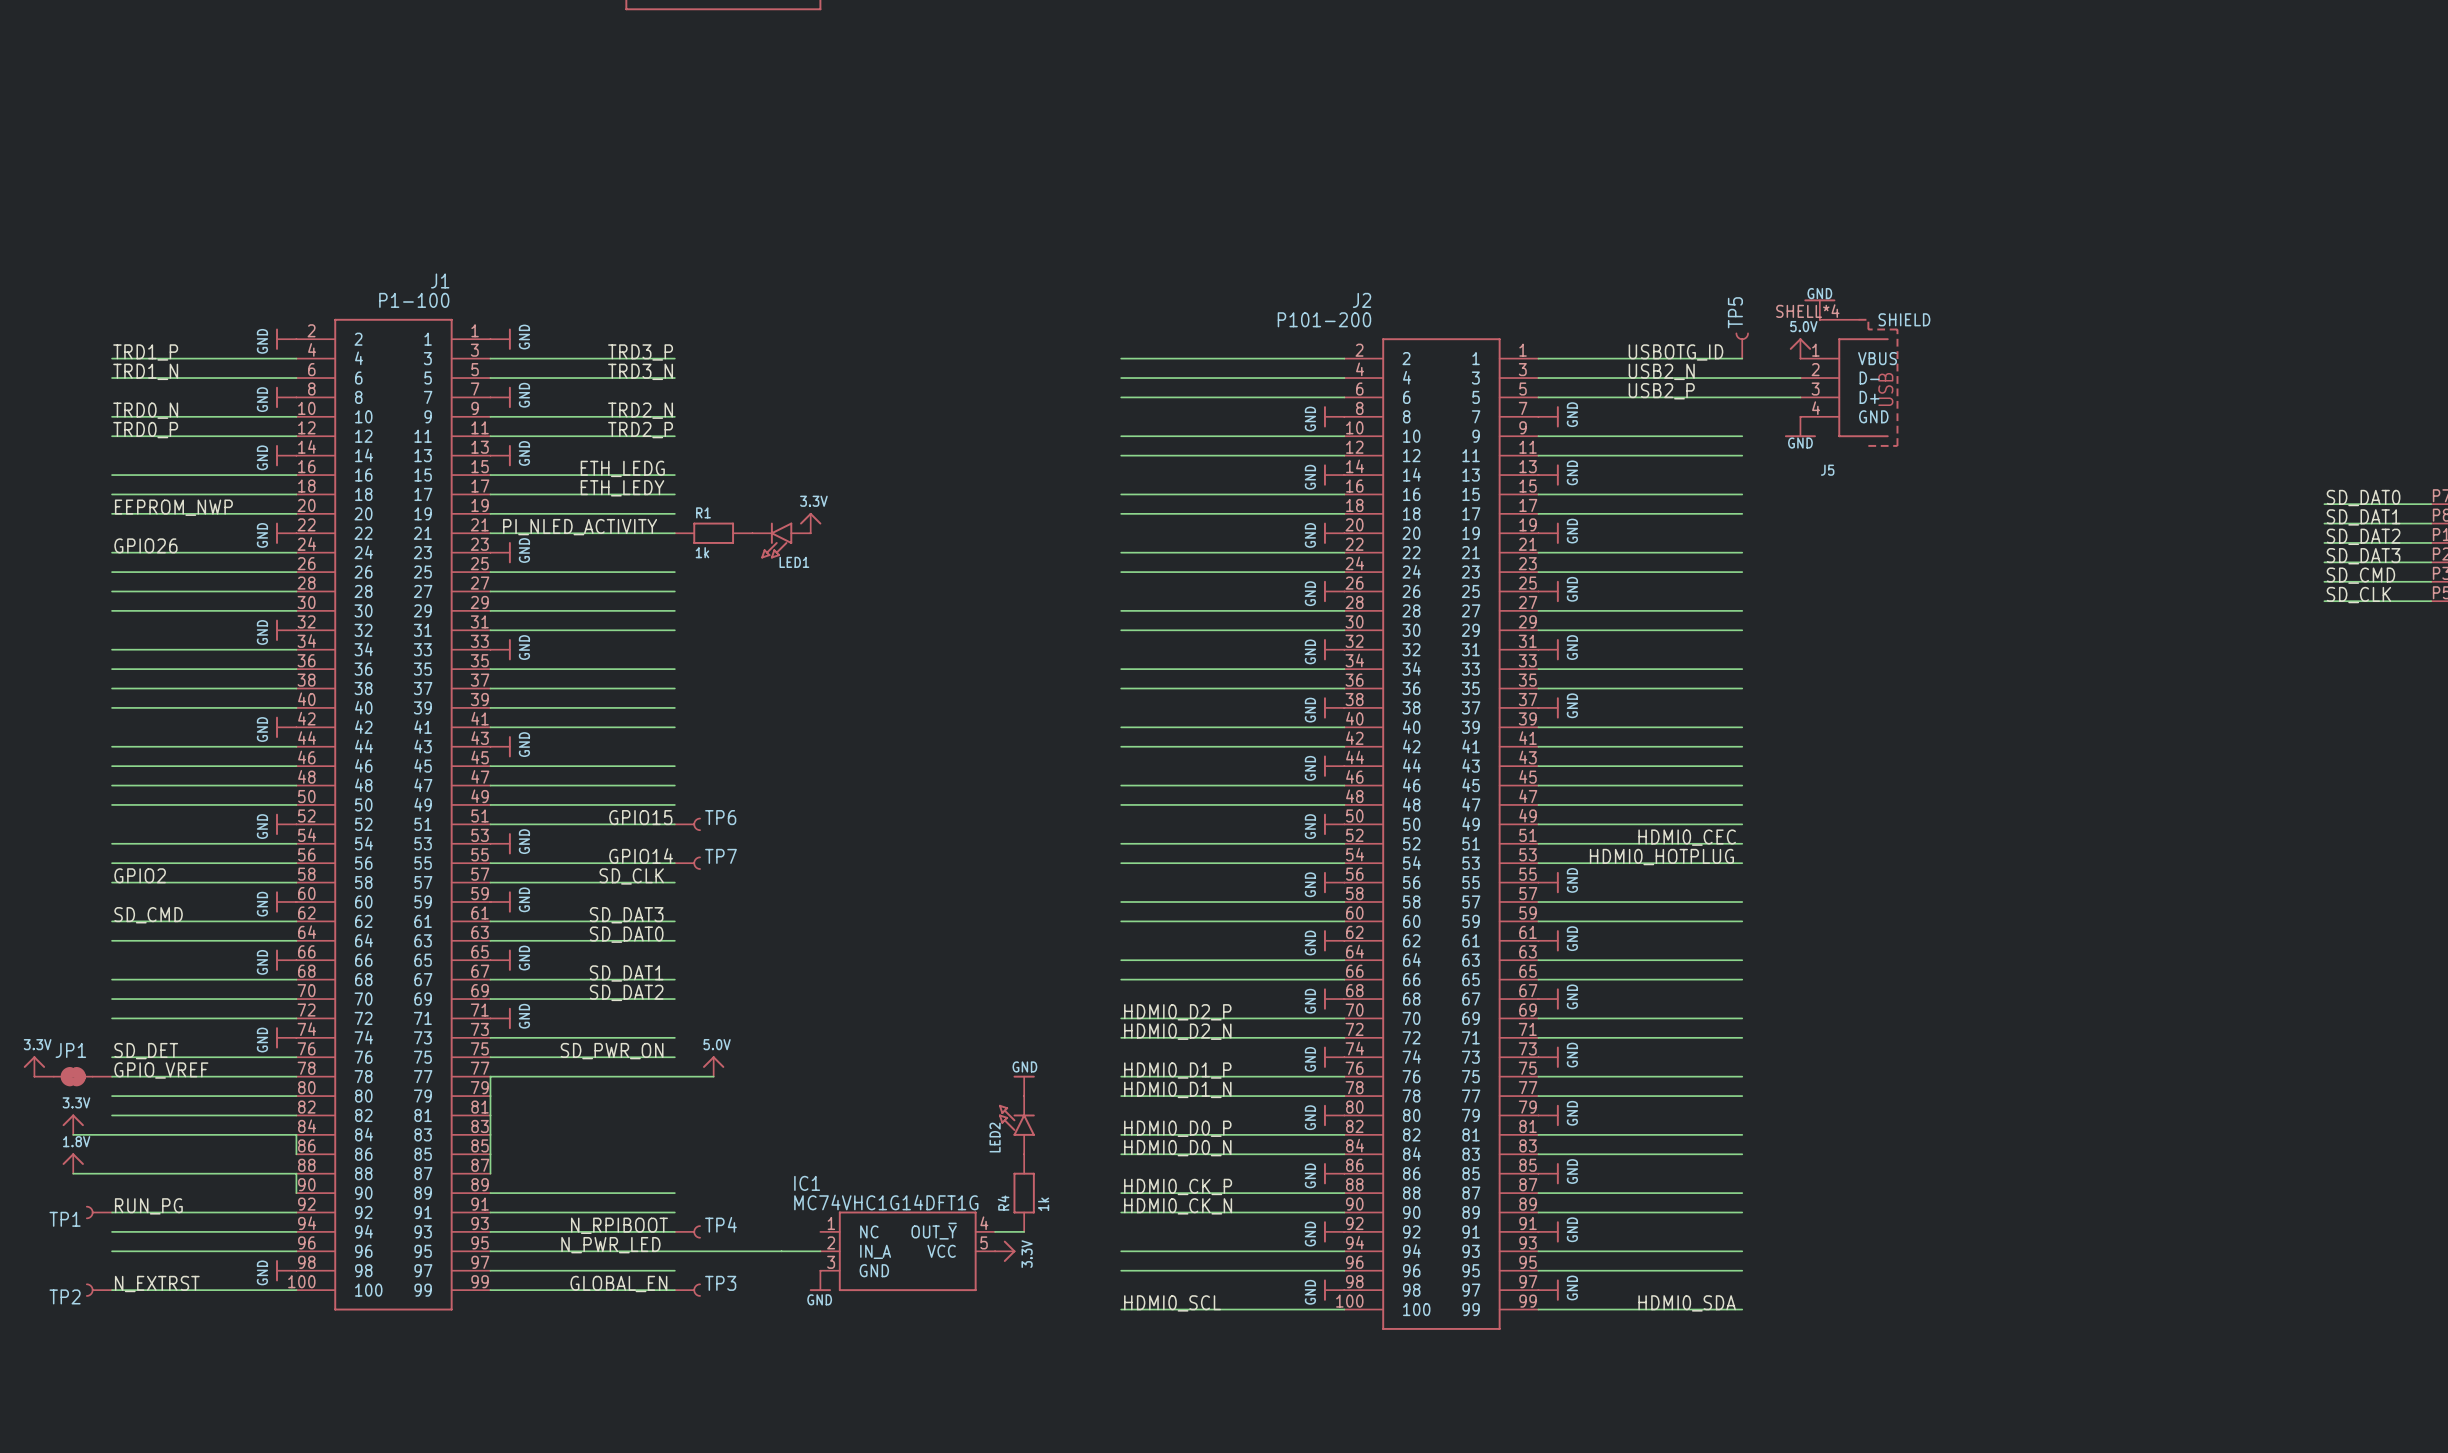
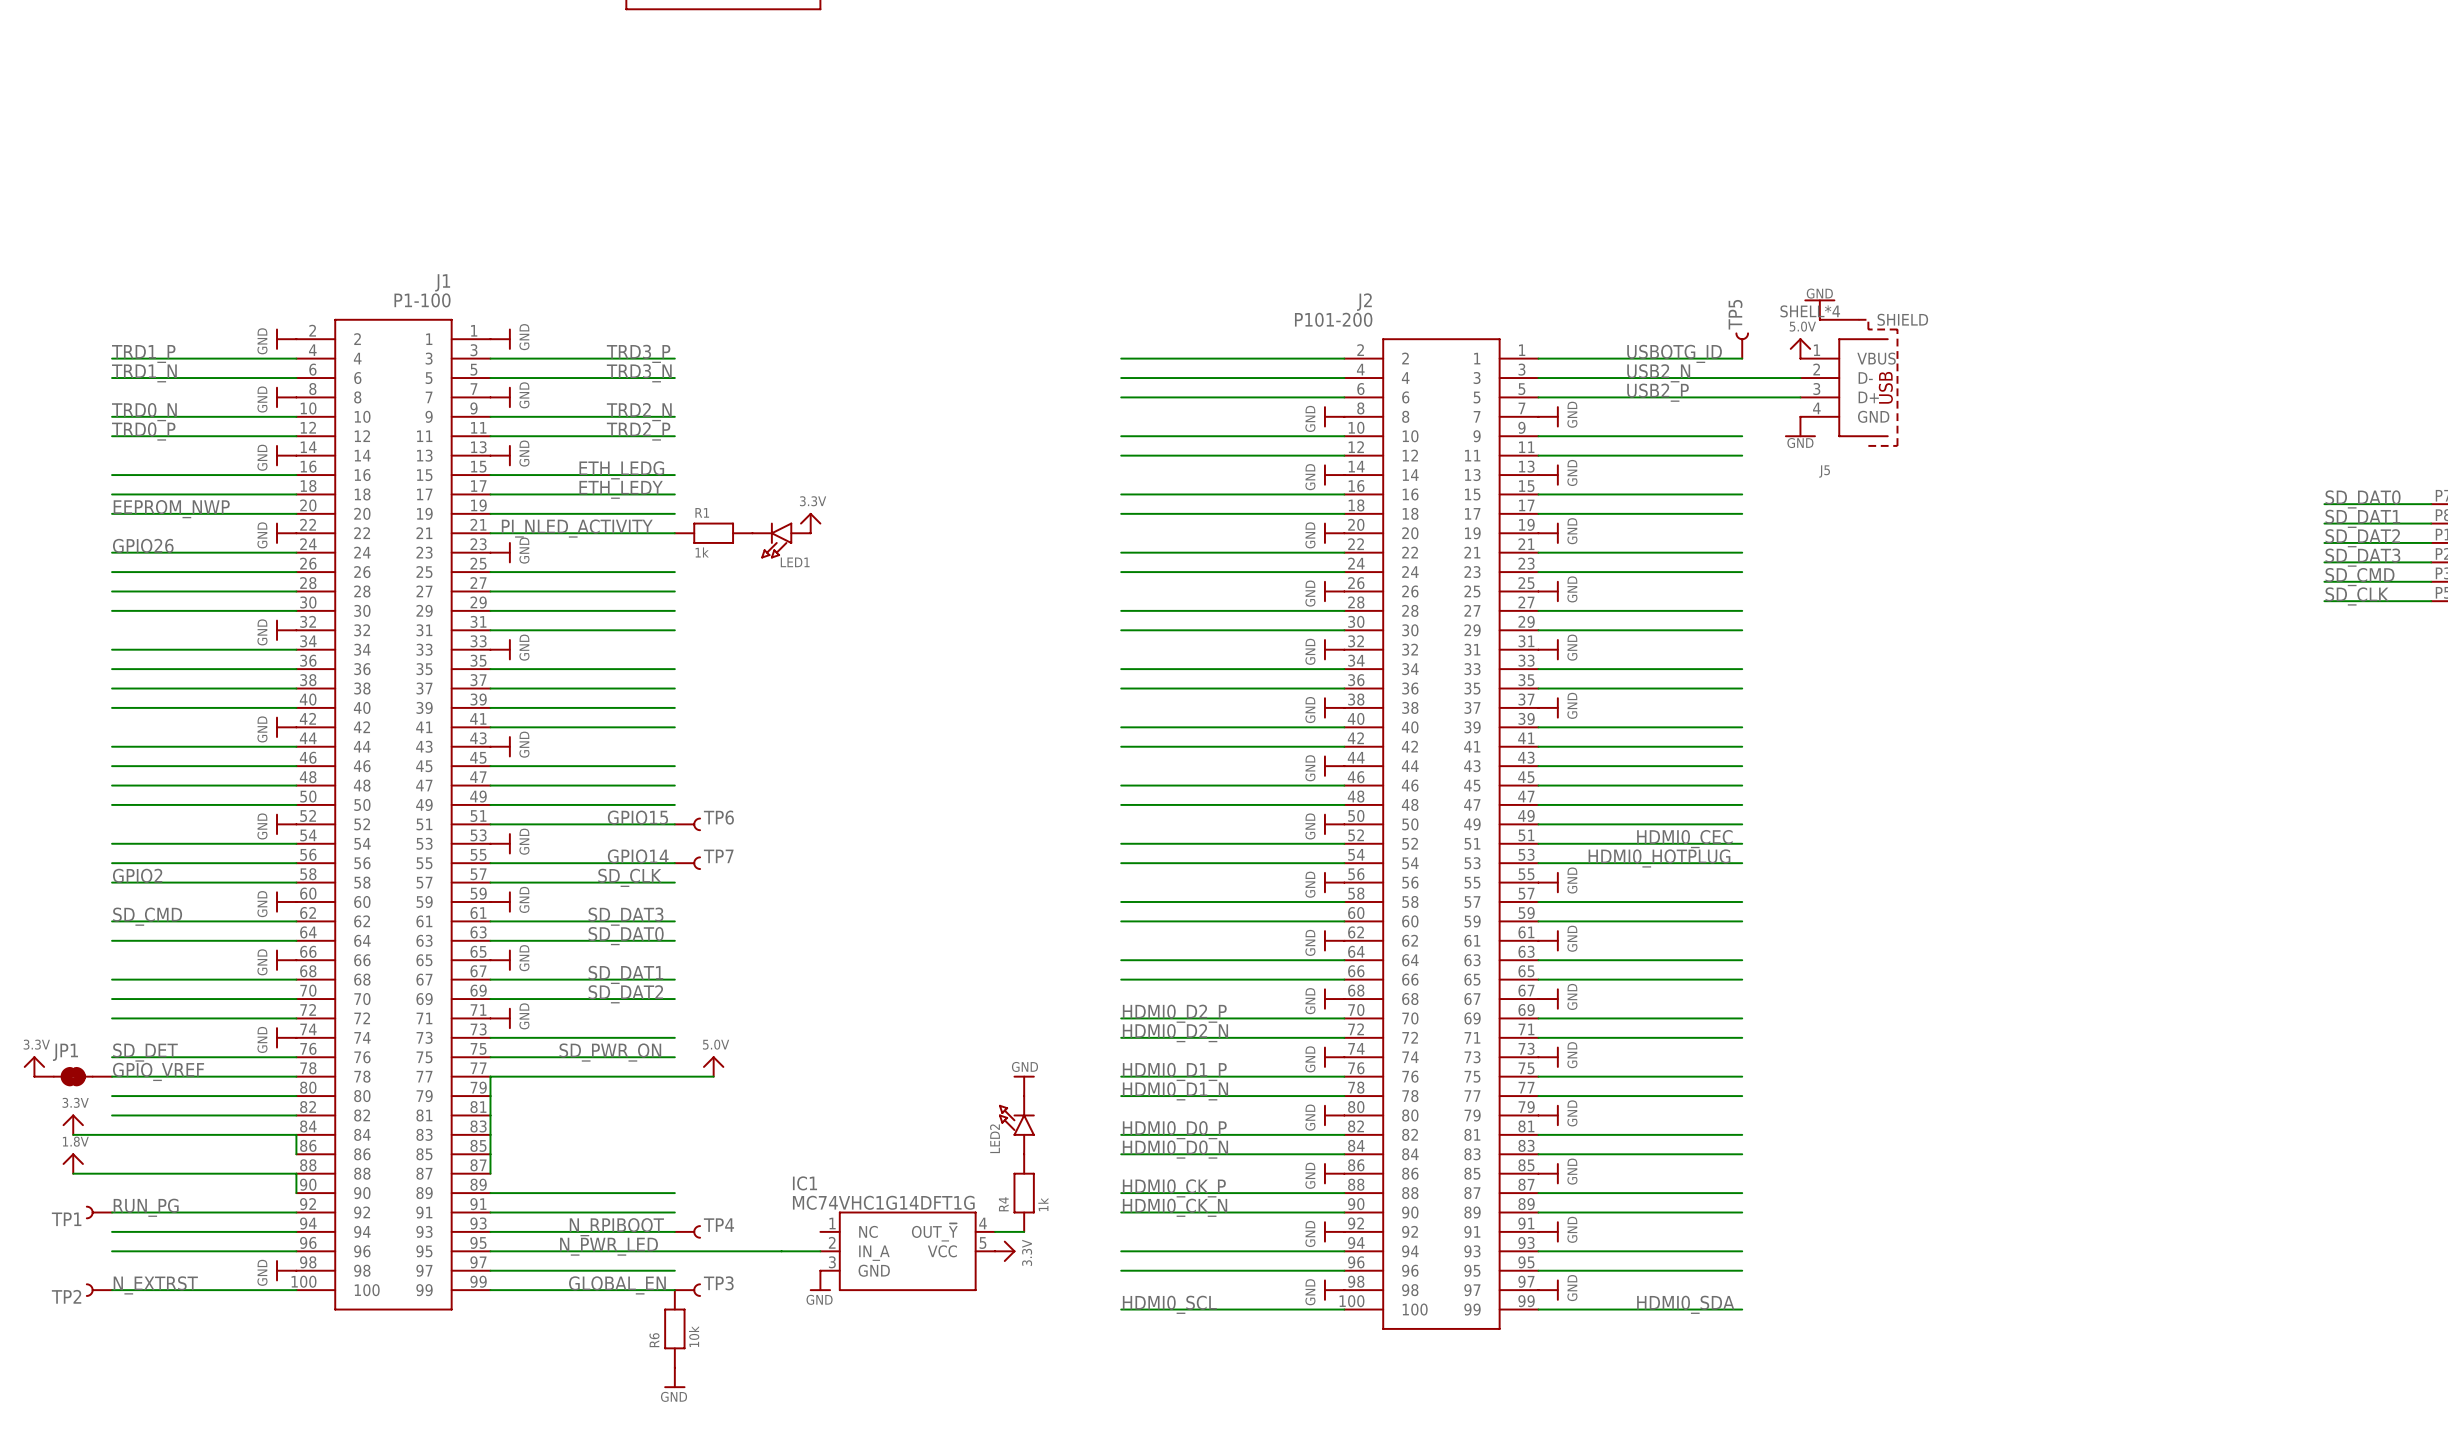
R6: none -> 10k (674, 1328)
power symbol: none -> GND (674, 1377)

